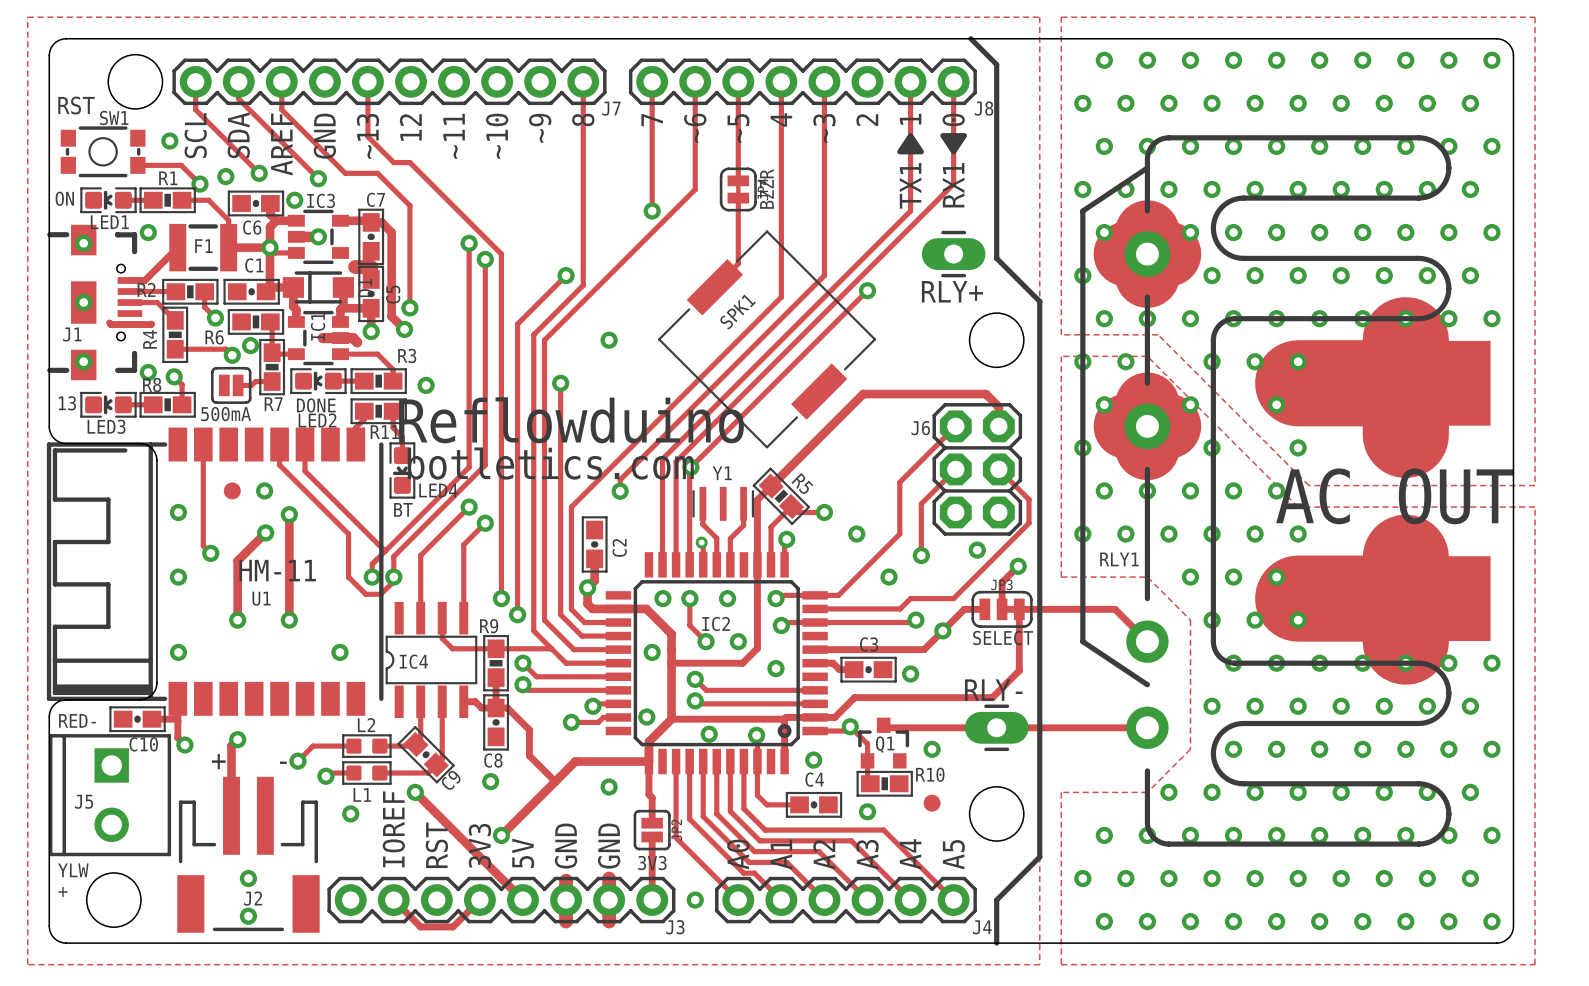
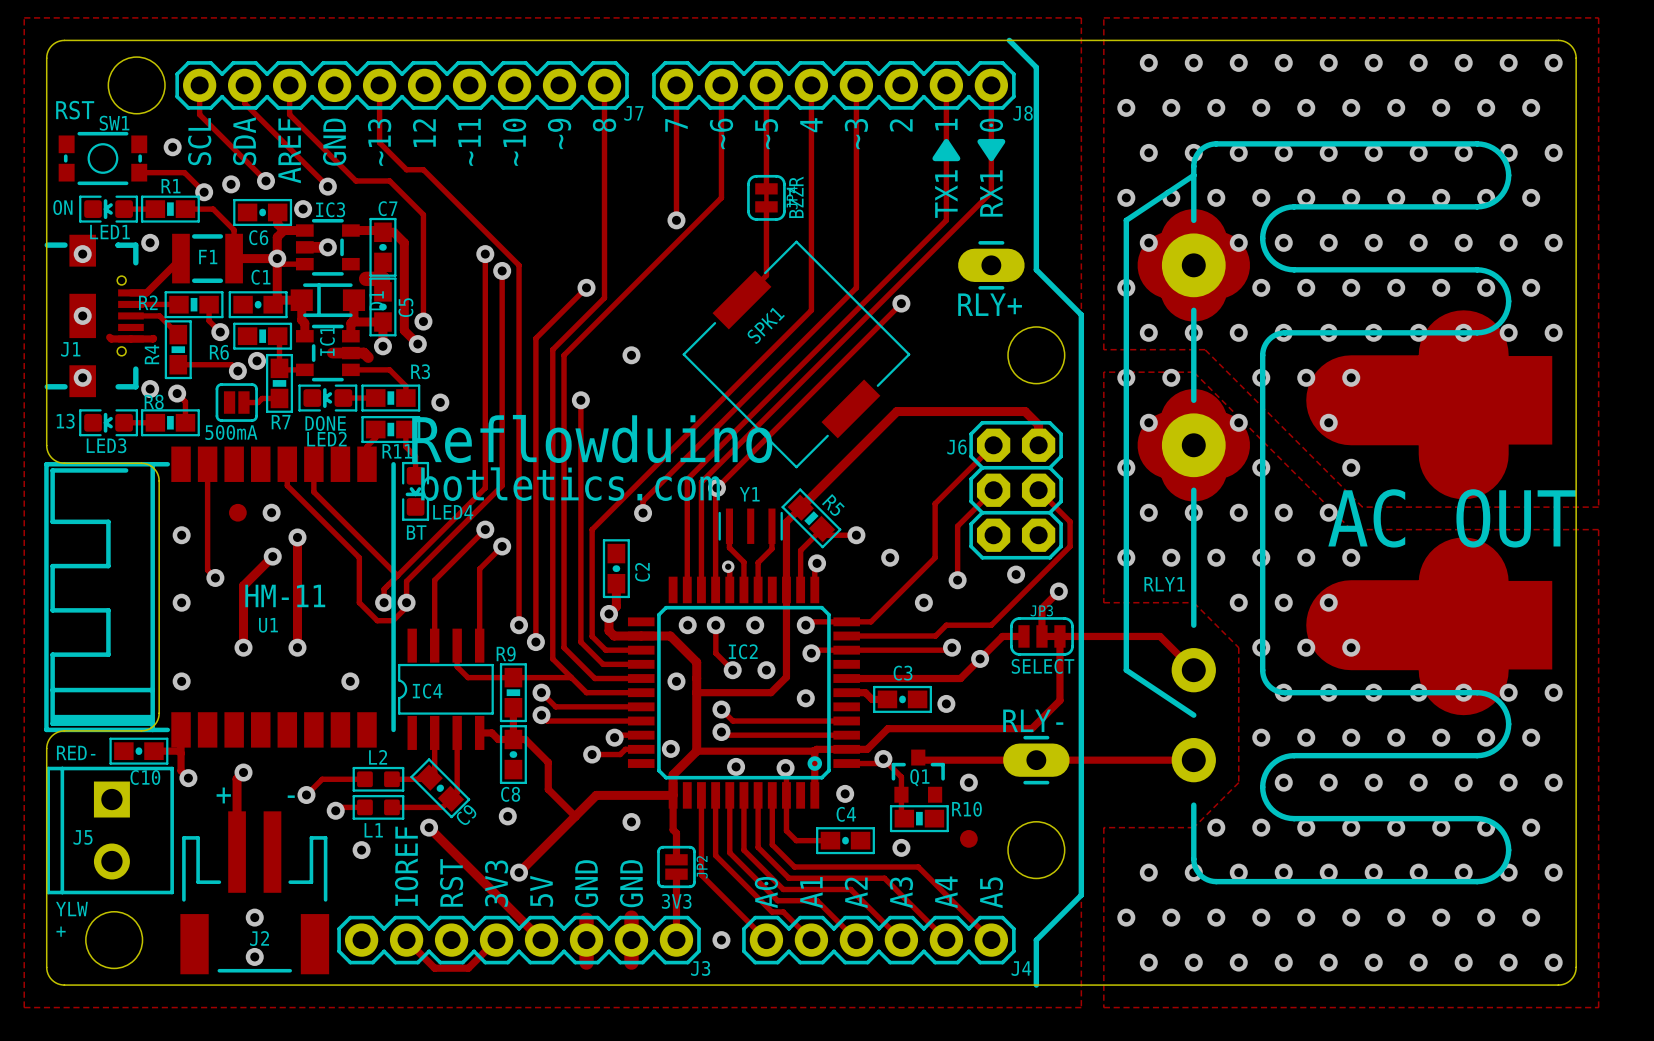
RLY1 footprint: [1080, 135, 1452, 847] -> [1123, 141, 1512, 885]

